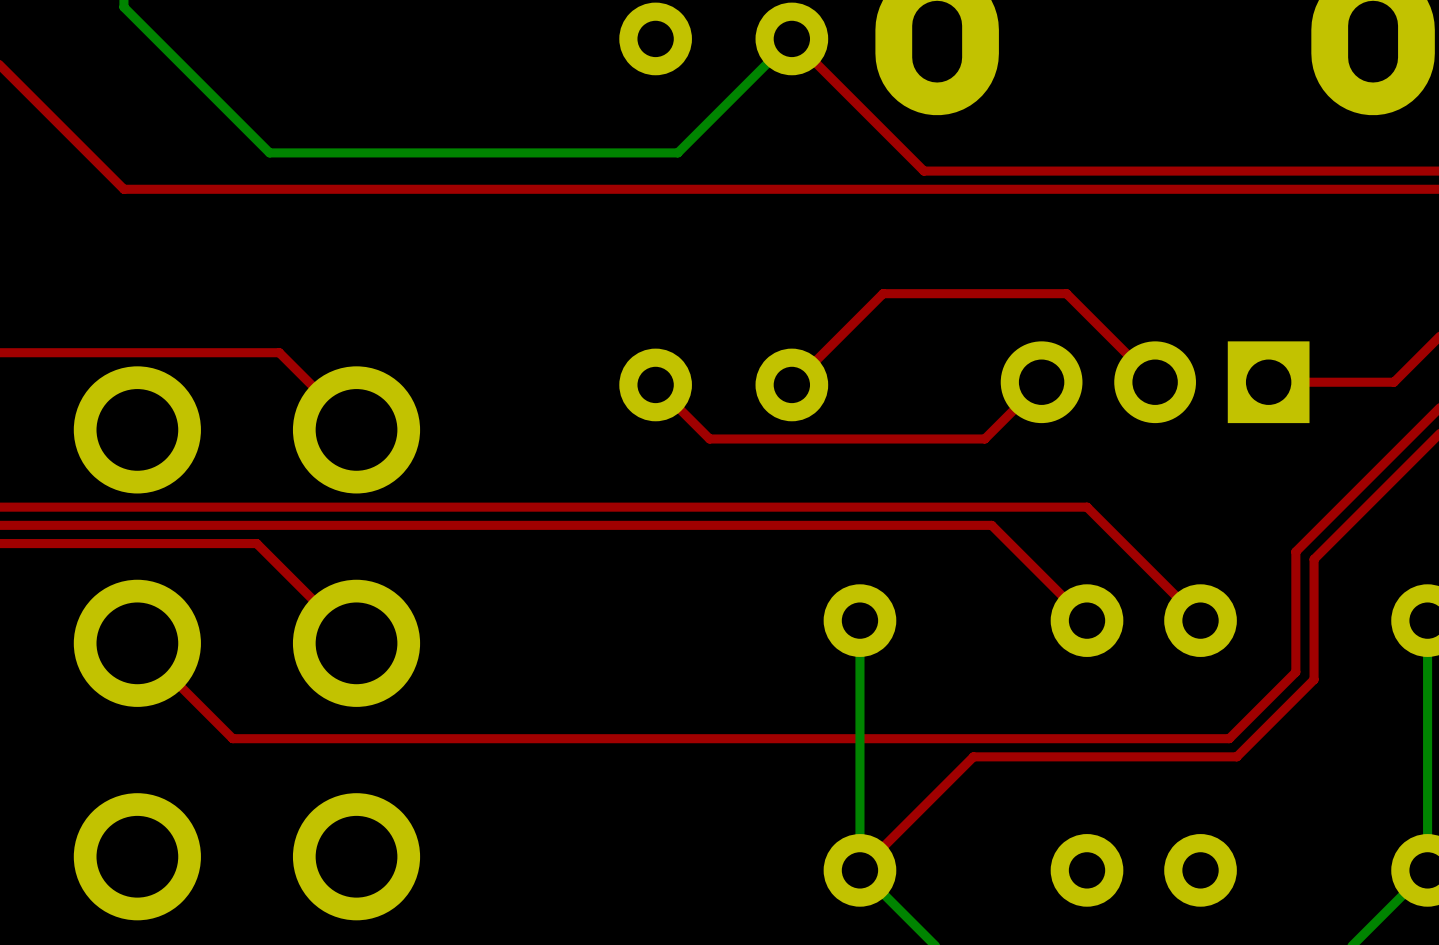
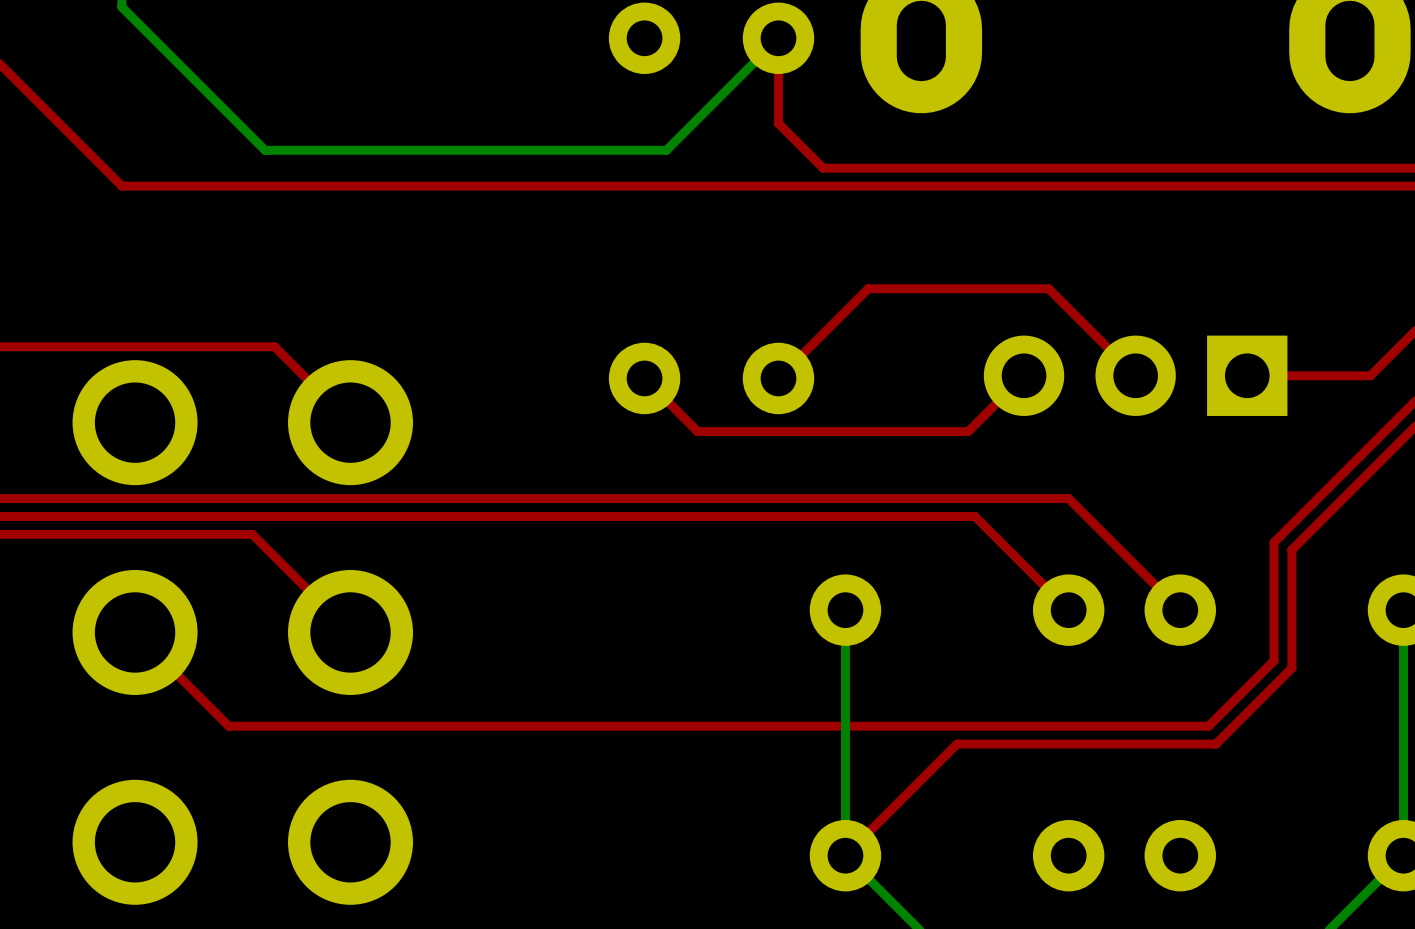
top track: (791, 38) (923, 171) -> (778, 38) (778, 123) (823, 168) (908, 168)

